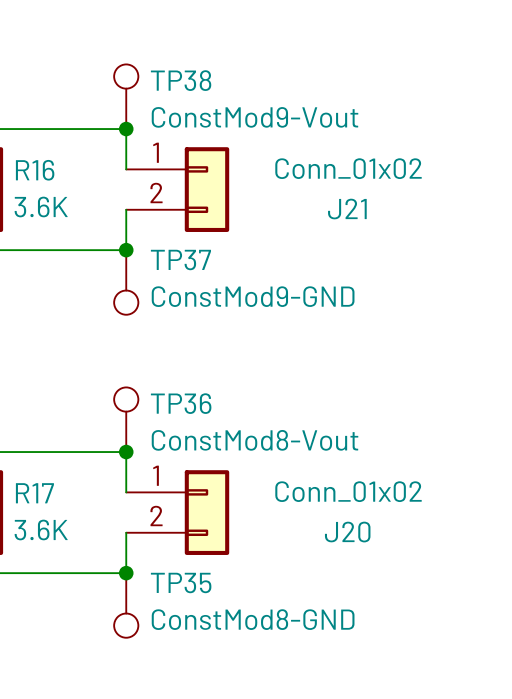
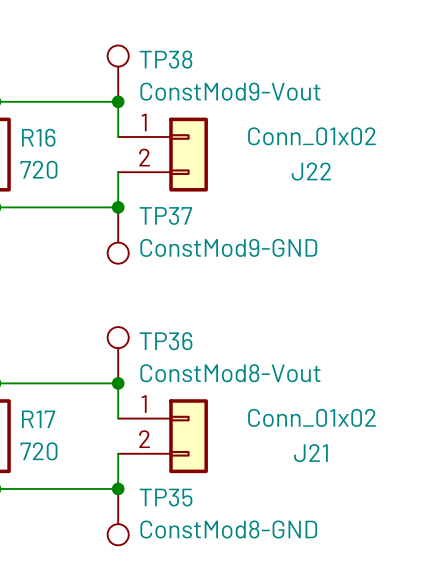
R16 value: 3.6K (41, 207) -> 720 (38, 169)
J21 name: J21 (347, 209) -> J22 (311, 171)
R17 value: 3.6K (41, 529) -> 720 (38, 451)
J20 name: J20 (347, 532) -> J21 (310, 453)

